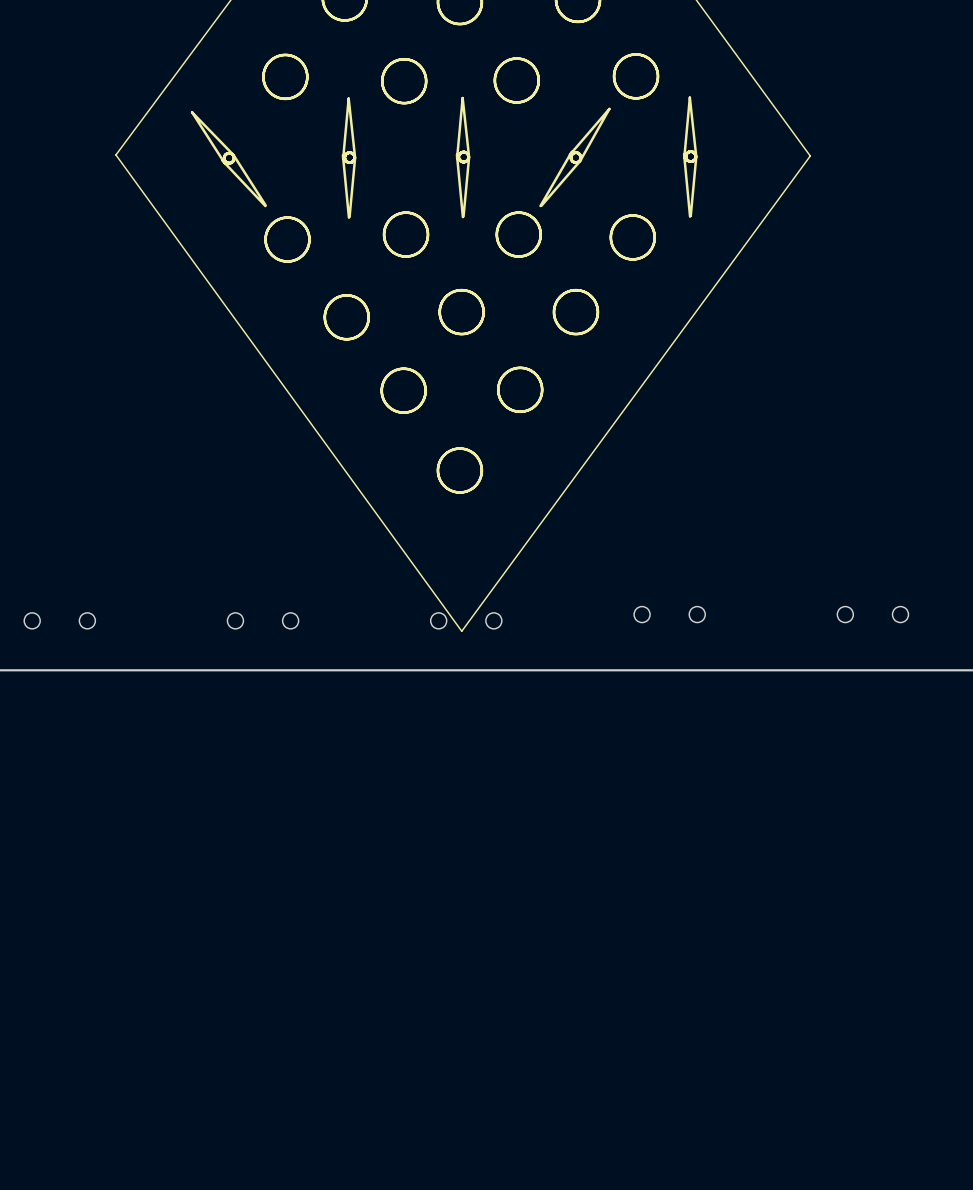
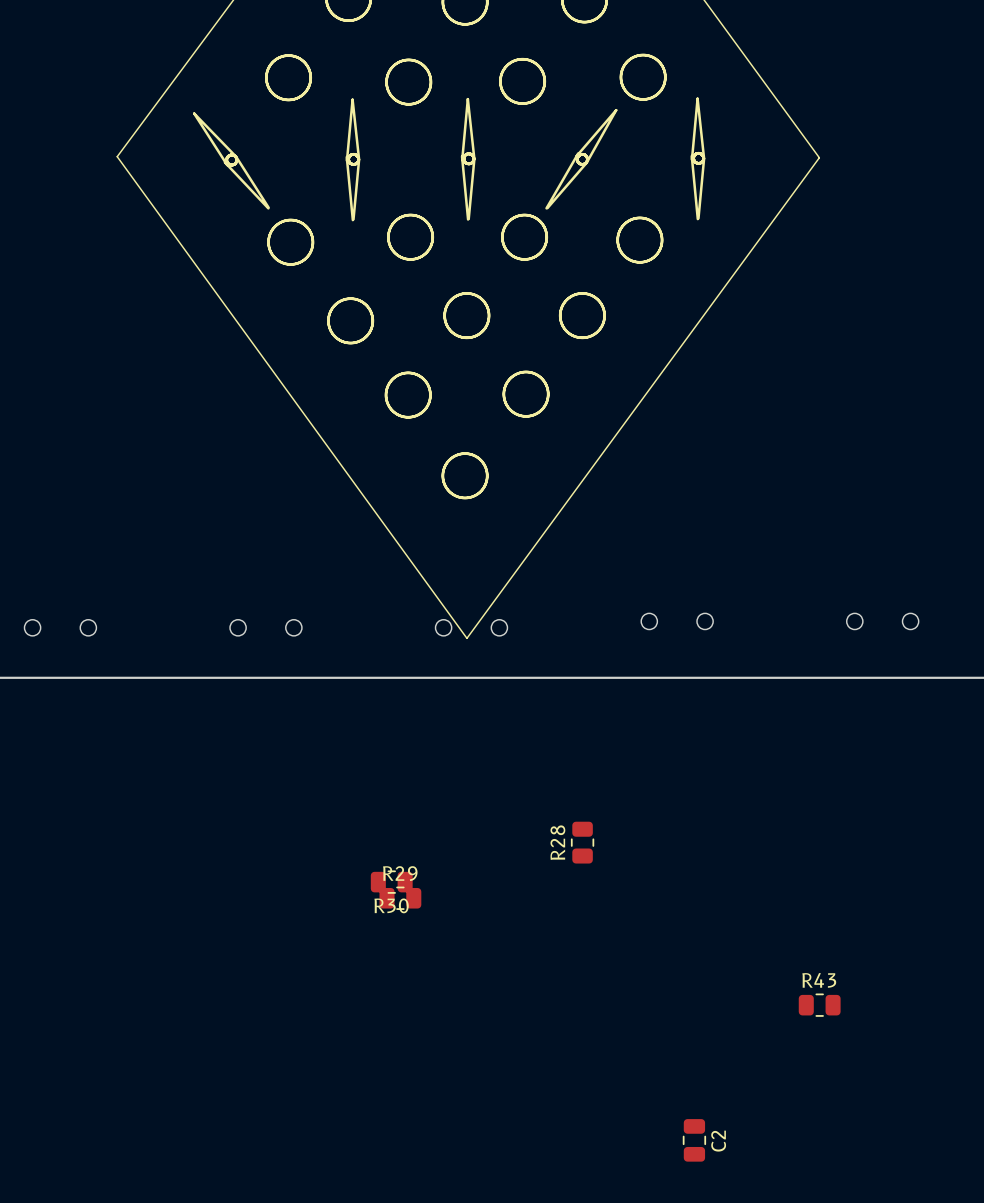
R28: none -> (582, 842)
R30: none -> (391, 882)
R29: none -> (400, 898)
R43: none -> (819, 1005)
C2: none -> (694, 1140)

